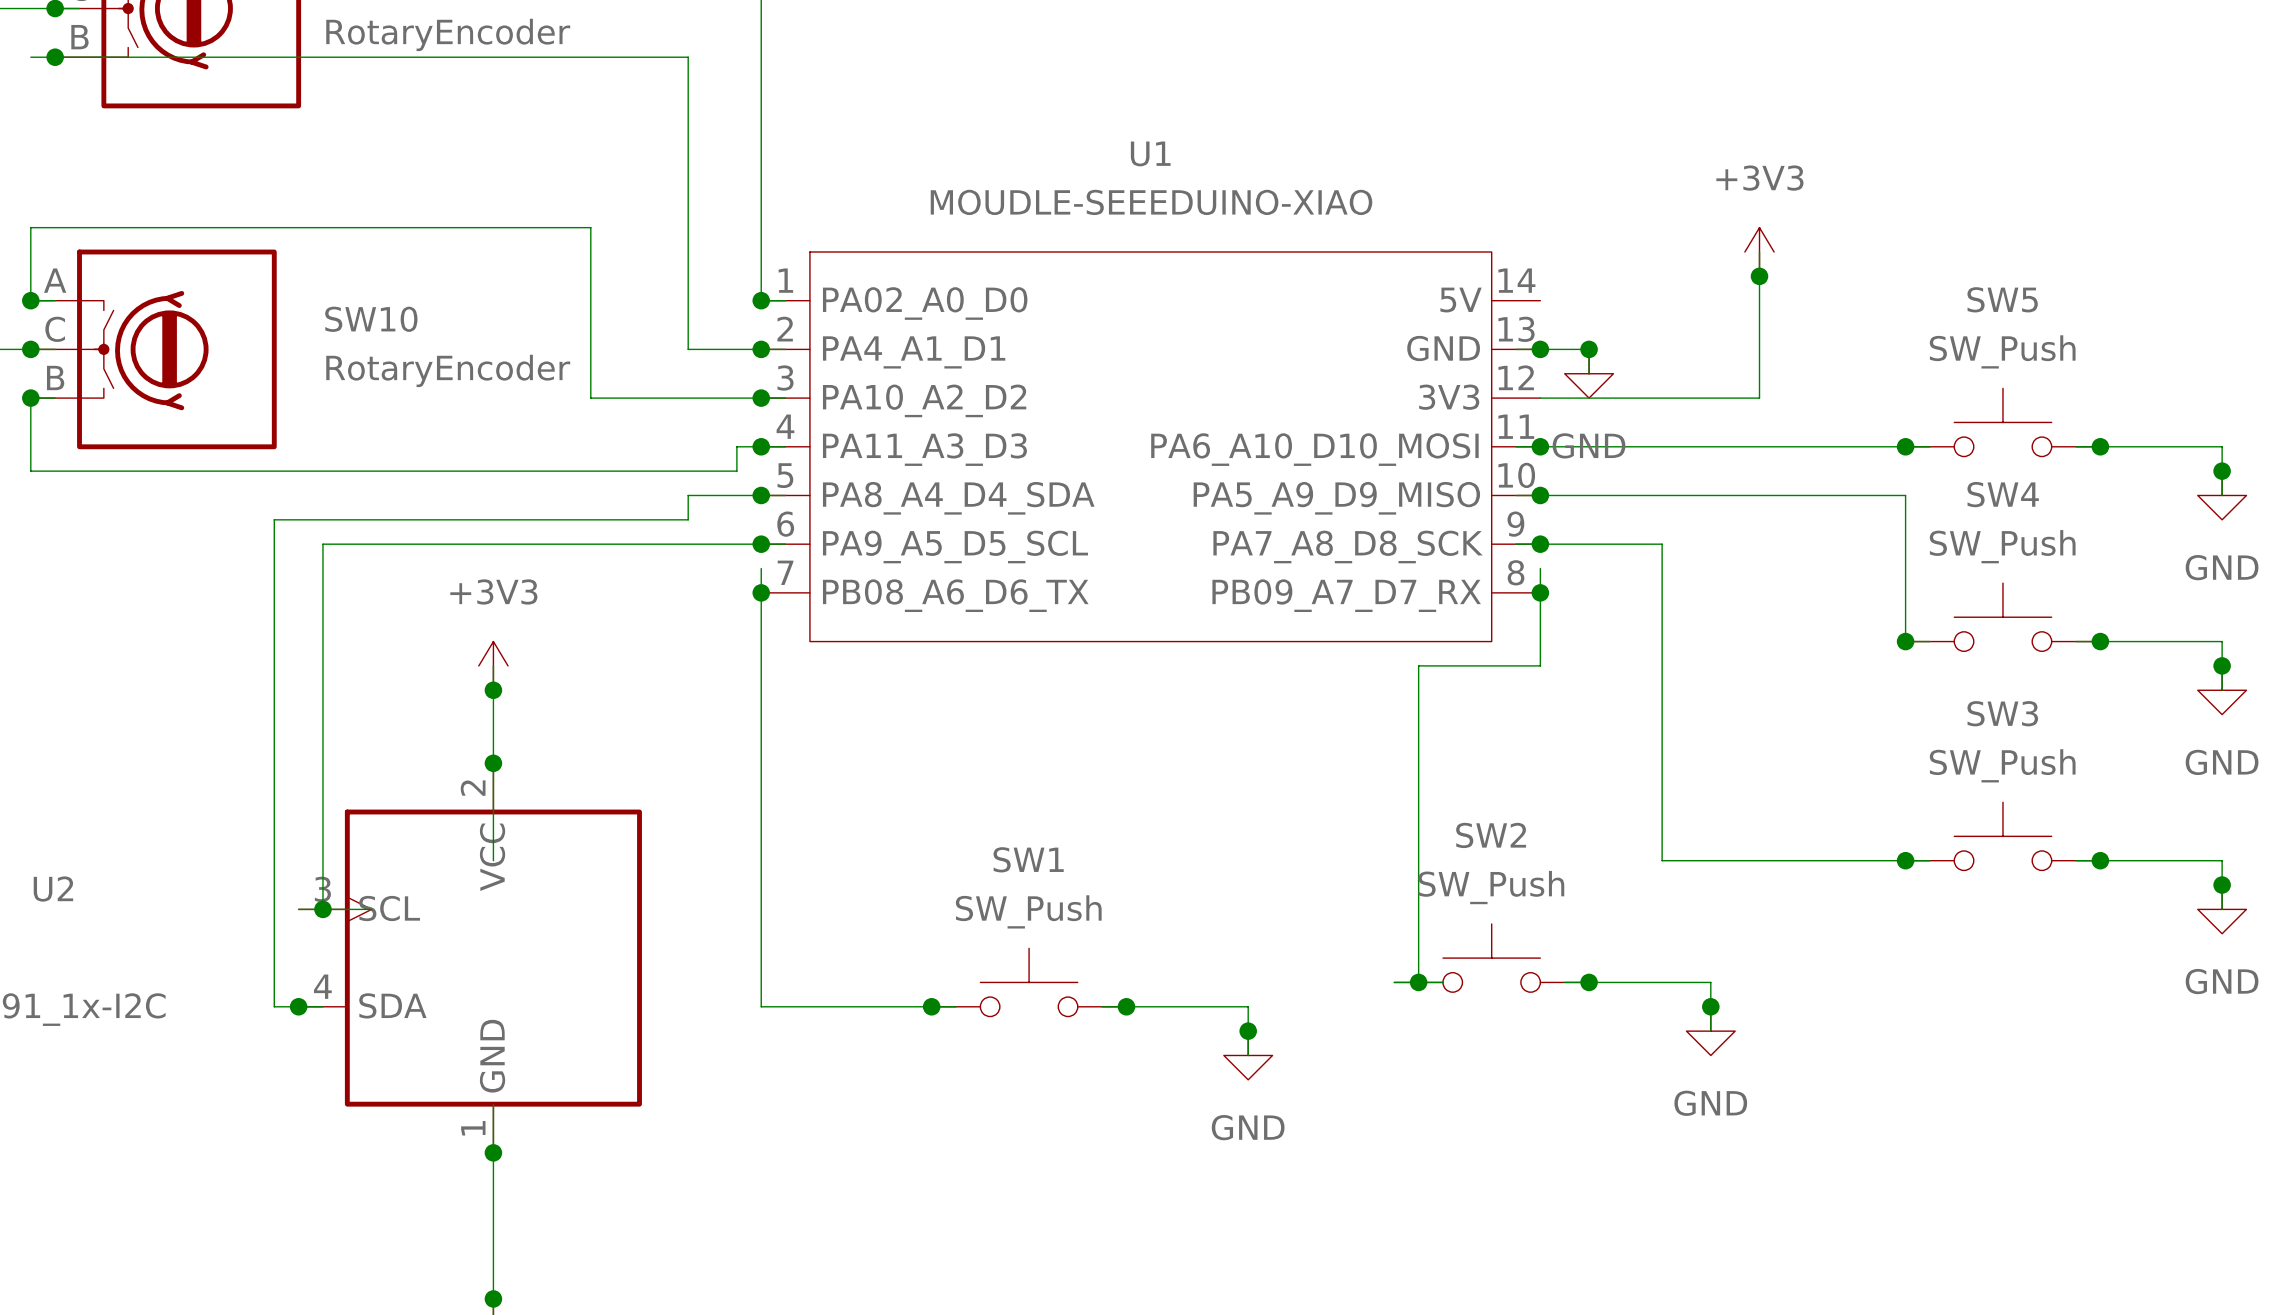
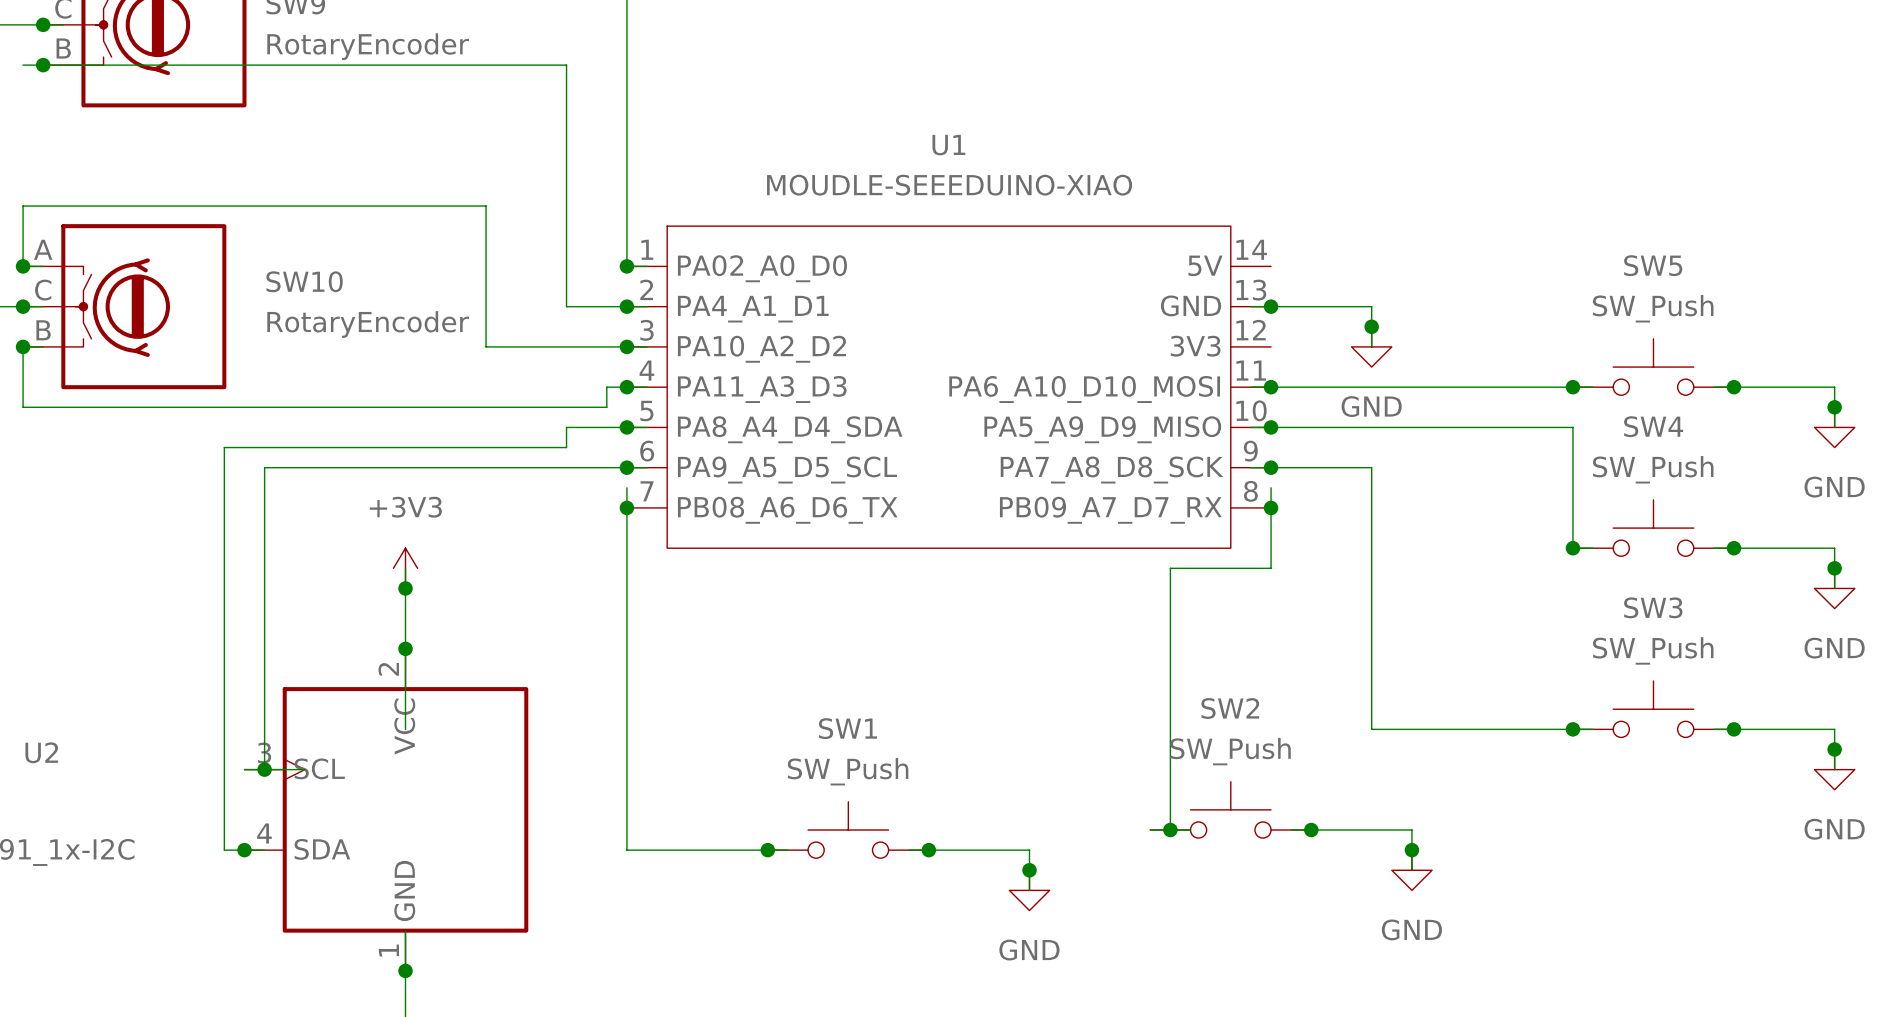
wire: (1759, 252) (1759, 398) (1540, 398) -> none
power symbol: +3V3 (1759, 252) -> none
junction: (1759, 276) -> none
wire: (1589, 349) (1589, 373) -> (1311, 306) (1371, 306) (1371, 346)
junction: (1589, 349) -> none
power symbol position: GND (1589, 373) -> GND (1371, 346)
junction: none -> (1371, 326)

